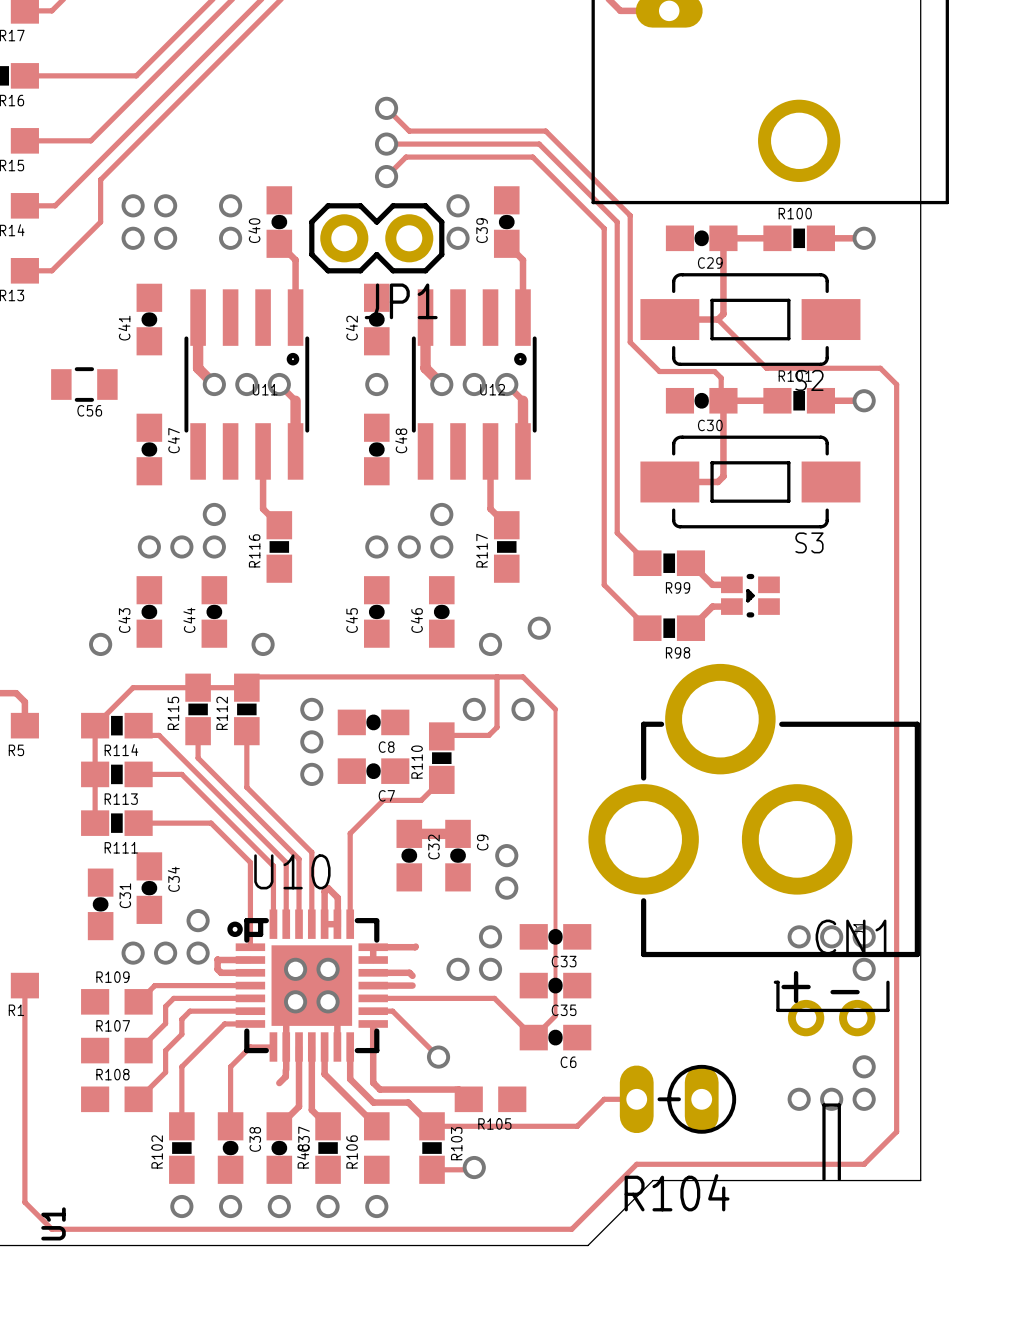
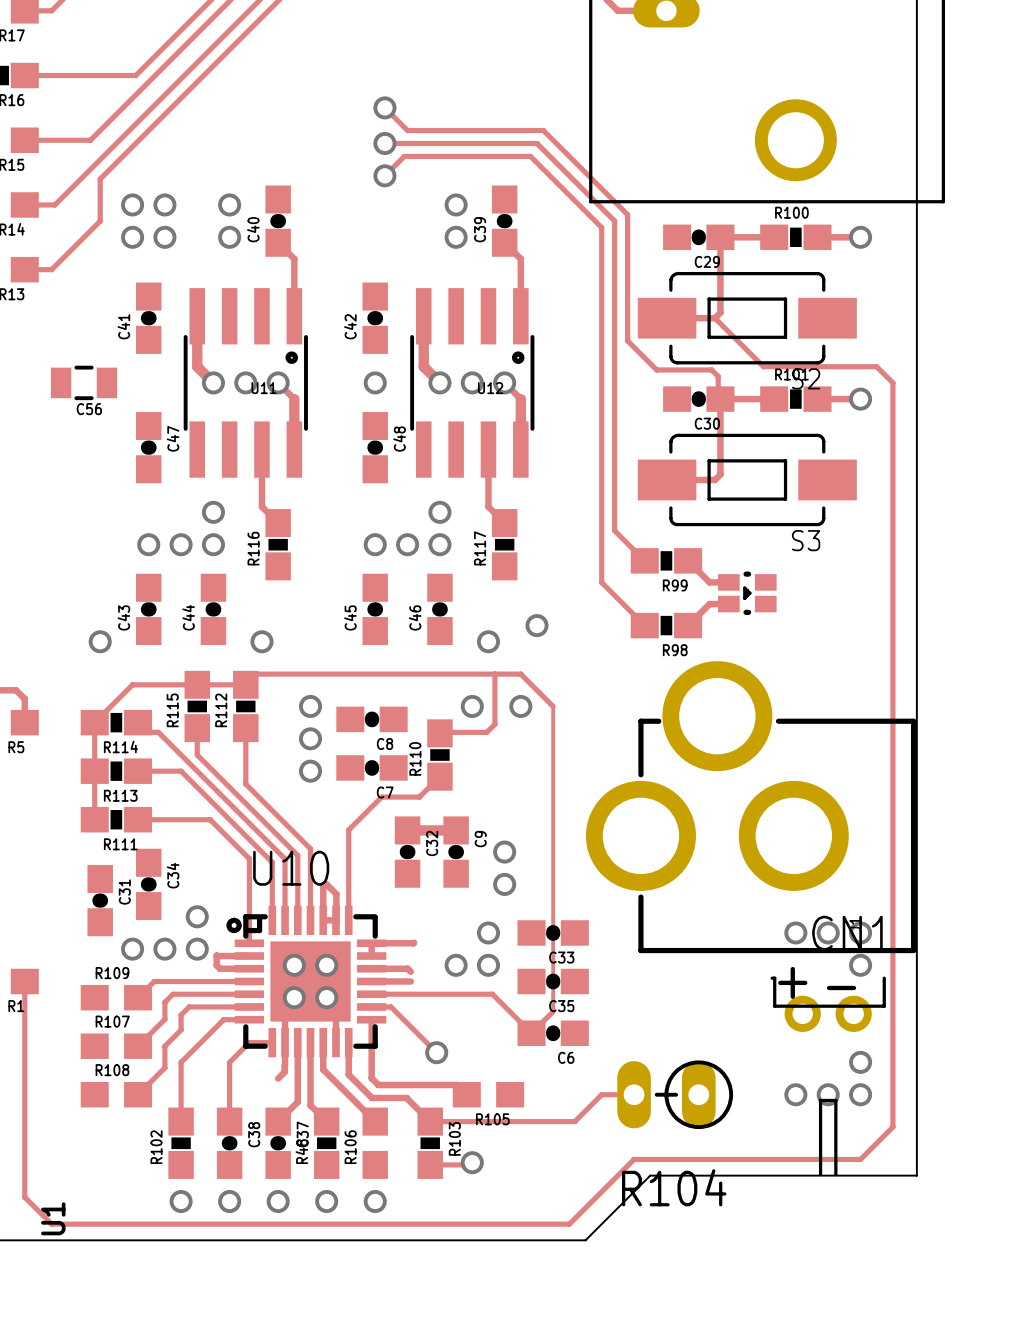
JP1: (376, 238) -> none

